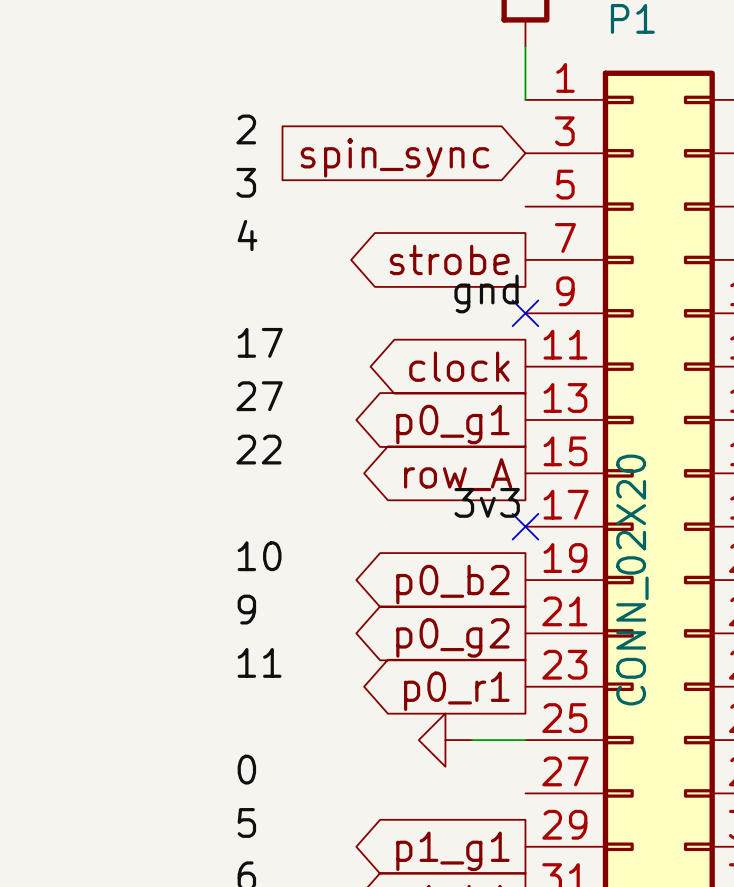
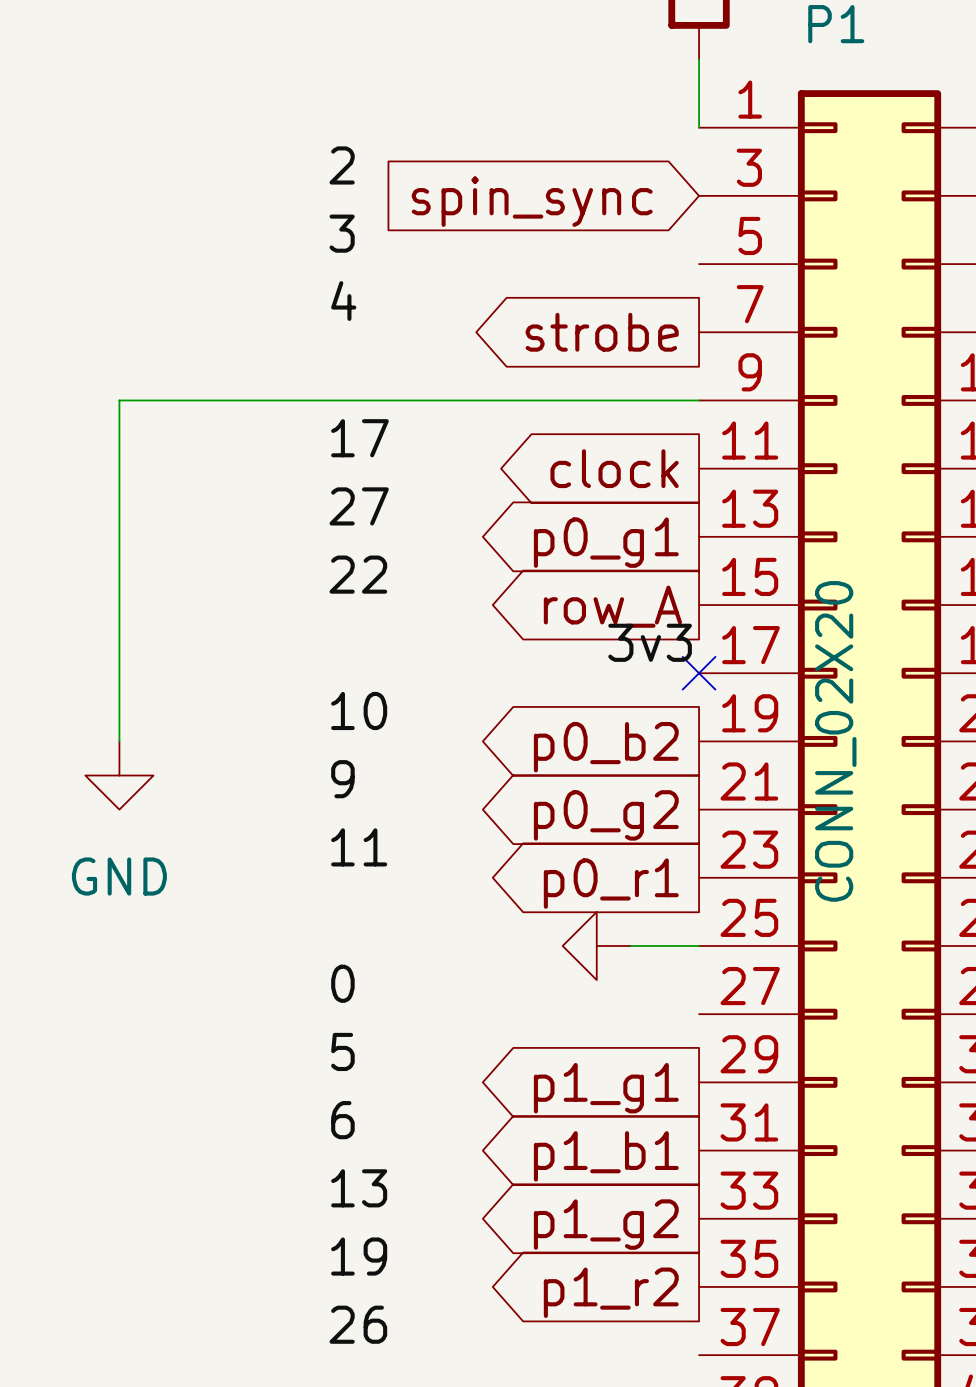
label: gnd (486, 293) -> none
wire: none -> (699, 400) (119, 400) (119, 741)
no-connect mark: (525, 313) -> none
power symbol: none -> GND (119, 775)

